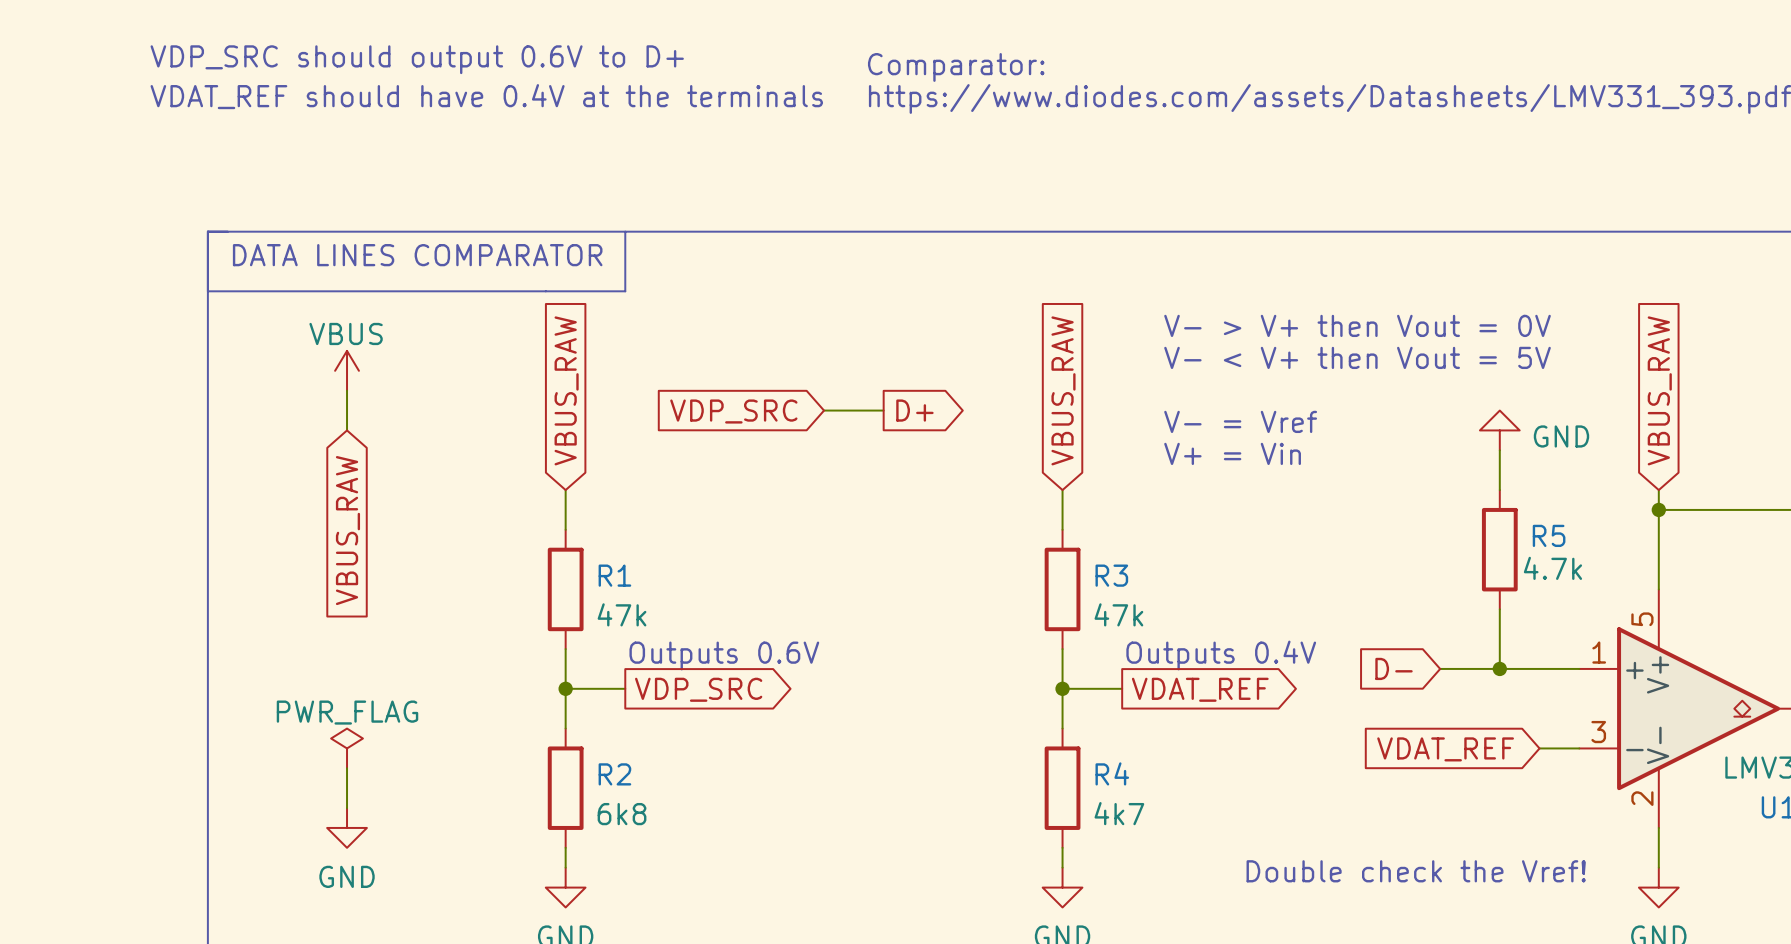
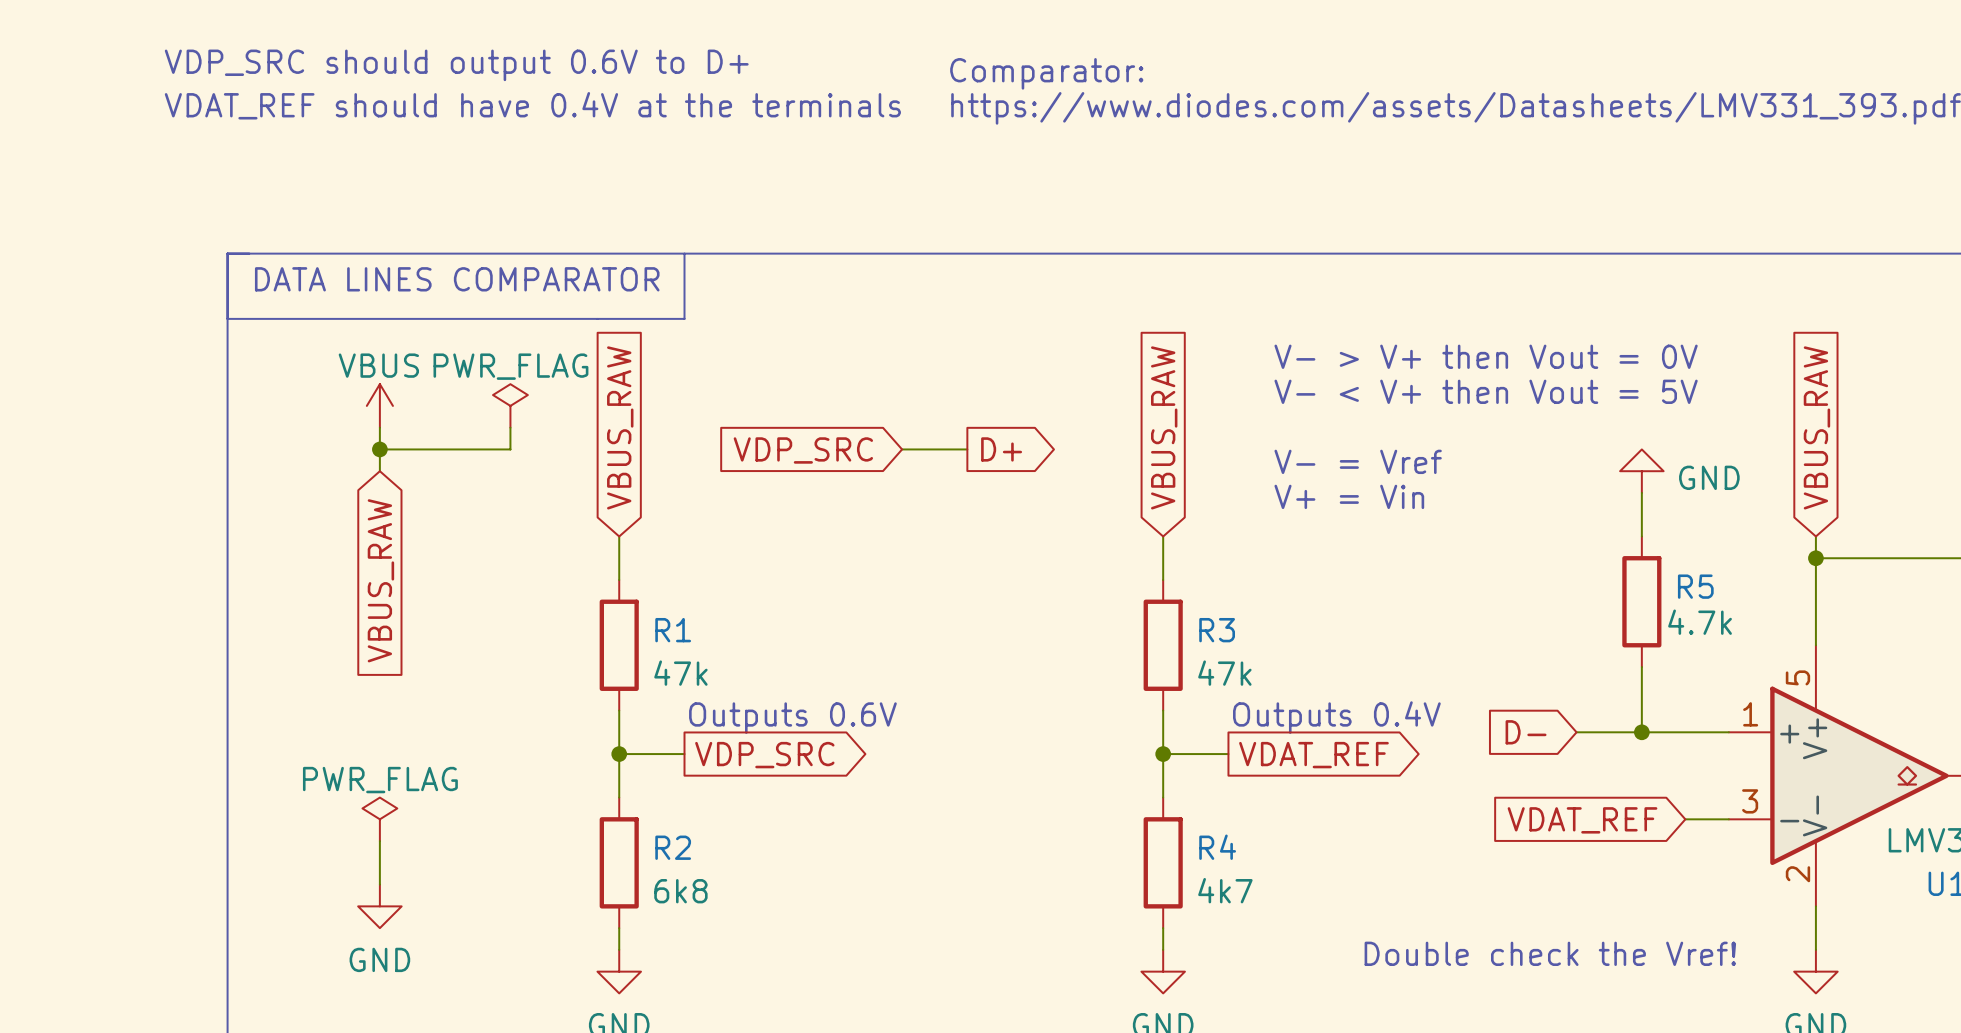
power symbol: none -> PWR_FLAG (510, 405)
wire: none -> (510, 427) (510, 449) (379, 449)
junction: none -> (379, 449)

